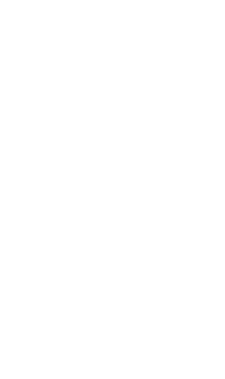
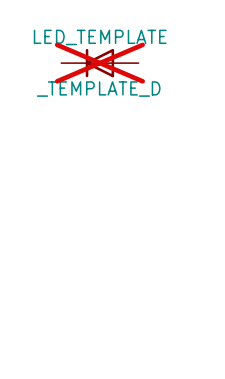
_TEMPLATE_D: none -> LED_TEMPLATE (99, 63)

